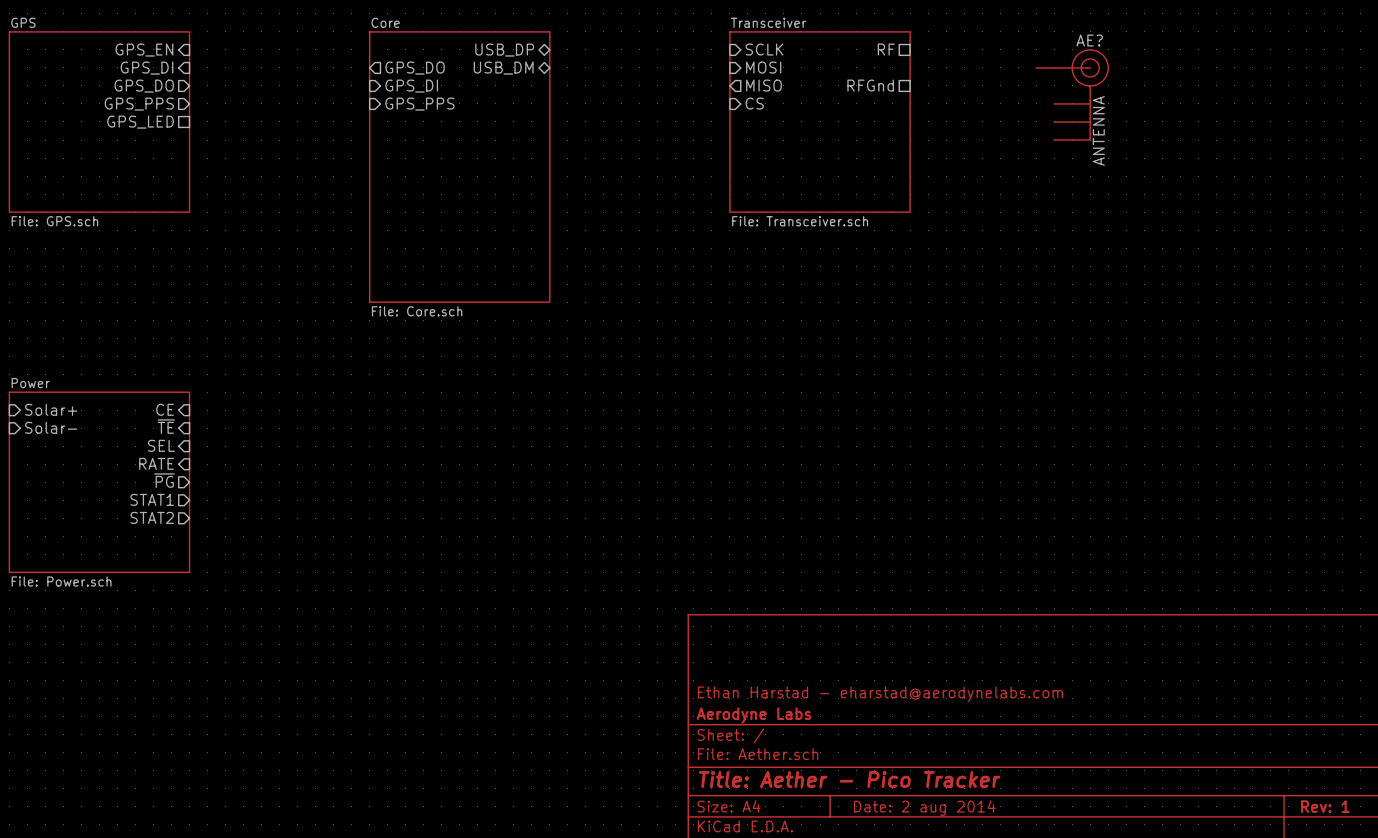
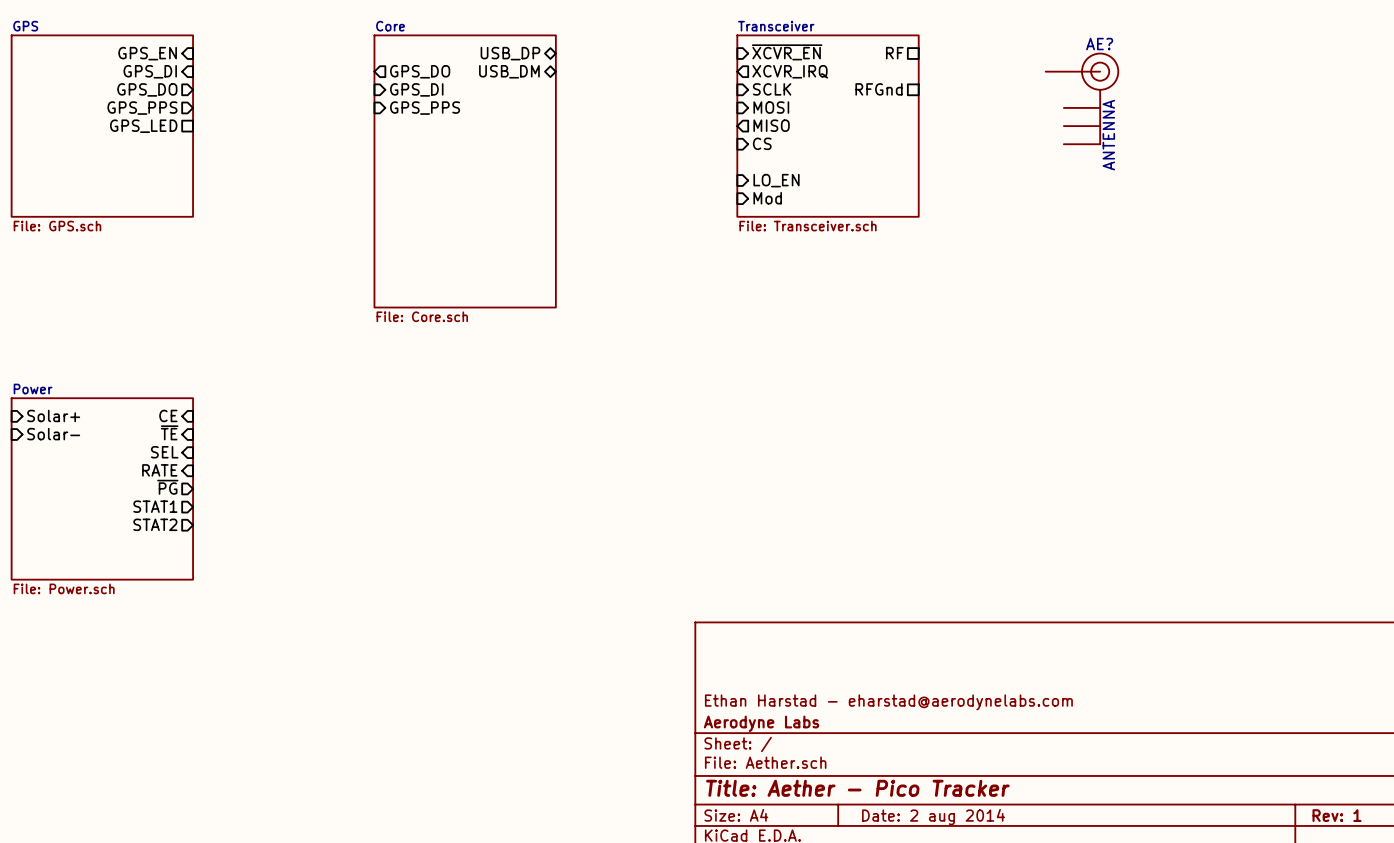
sheet pin: SCLK (764, 49) -> ~{XCVR_EN} (787, 52)
sheet pin shape: input (763, 67) -> output (790, 71)
sheet pin: MOSI (763, 67) -> XCVR_IRQ (790, 71)
sheet pin shape: output (763, 85) -> input (772, 89)
sheet pin: MISO (763, 85) -> SCLK (772, 89)
sheet pin: CS (754, 103) -> MOSI (771, 107)
sheet pin: none -> MISO (771, 125)
sheet pin: none -> CS (762, 143)
sheet pin: none -> LO_EN (776, 180)
sheet pin: none -> Mod (767, 198)

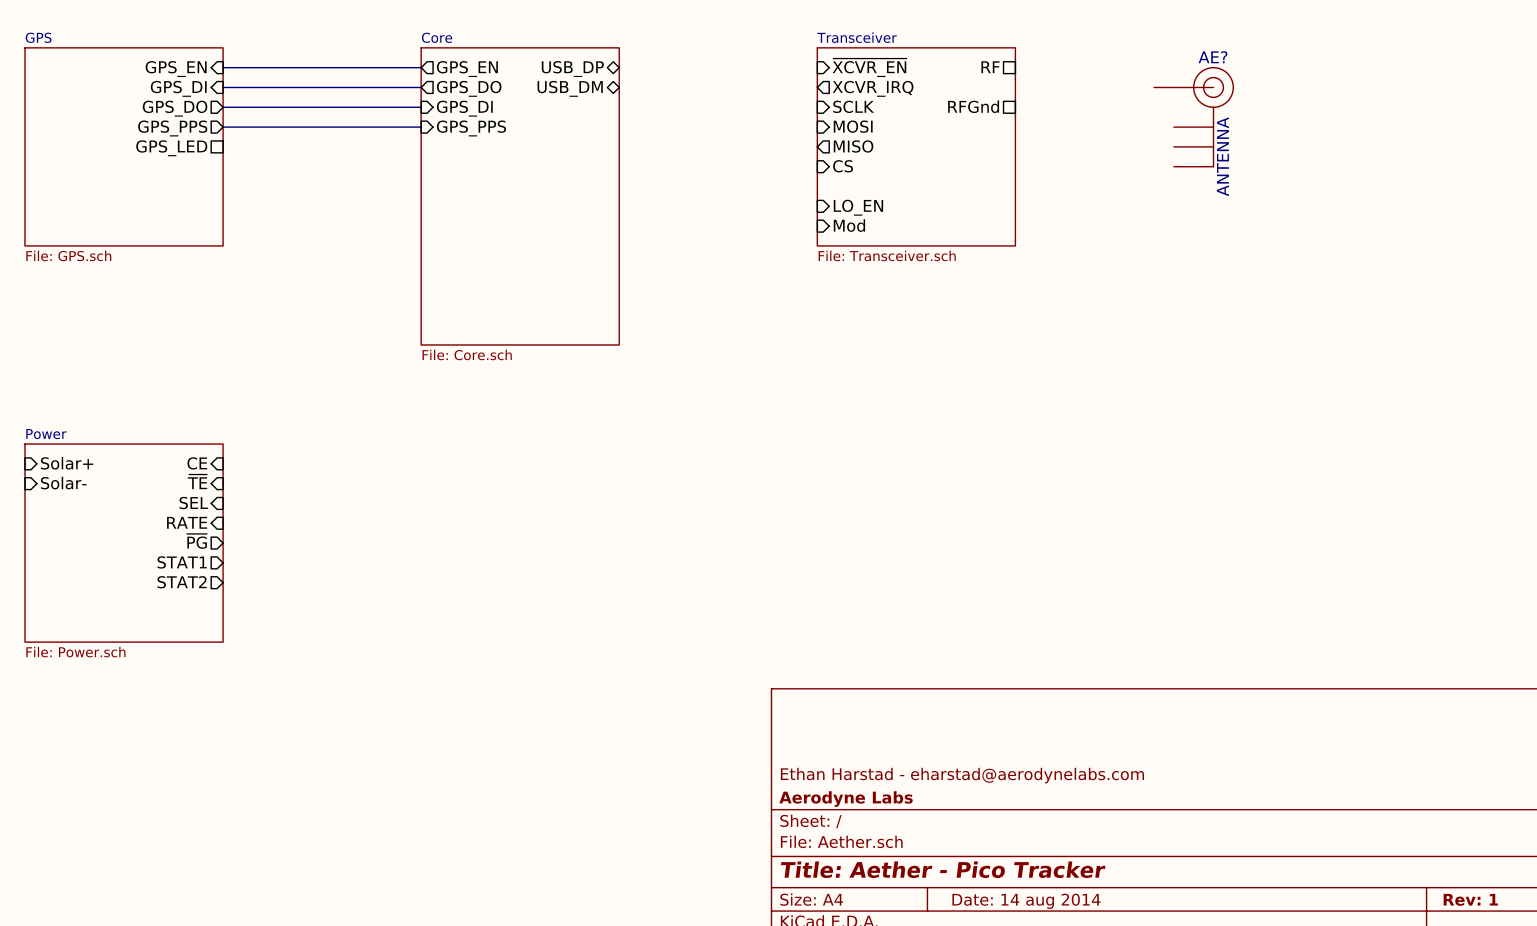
wire: none -> (223, 67) (421, 67)
sheet pin: none -> GPS_EN (467, 69)
wire: none -> (223, 87) (421, 87)
wire: none -> (223, 107) (421, 107)
wire: none -> (223, 127) (421, 127)
title block: Date: 2 aug 2014 (933, 817) -> Date: 14 aug 2014 (1026, 901)

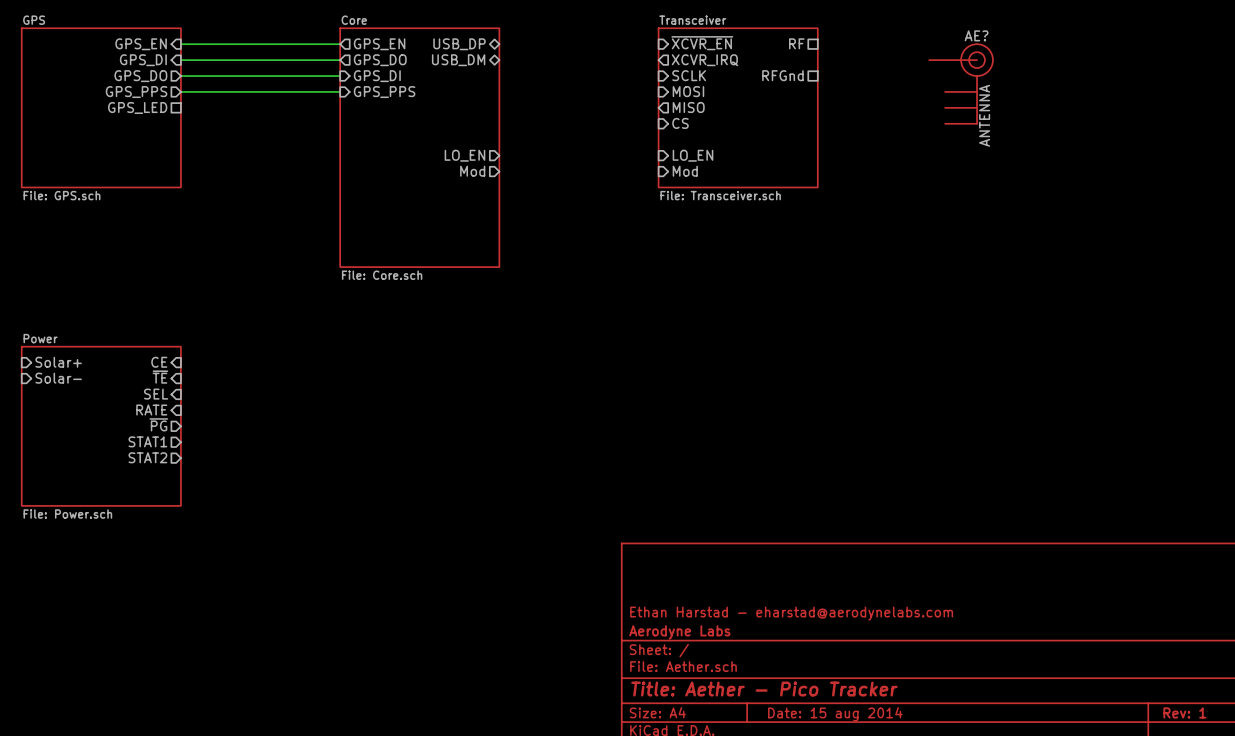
sheet pin: none -> LO_EN (464, 155)
sheet pin: none -> Mod (472, 171)
title block: Date: 14 aug 2014 (1026, 901) -> Date: 15 aug 2014 (835, 714)

